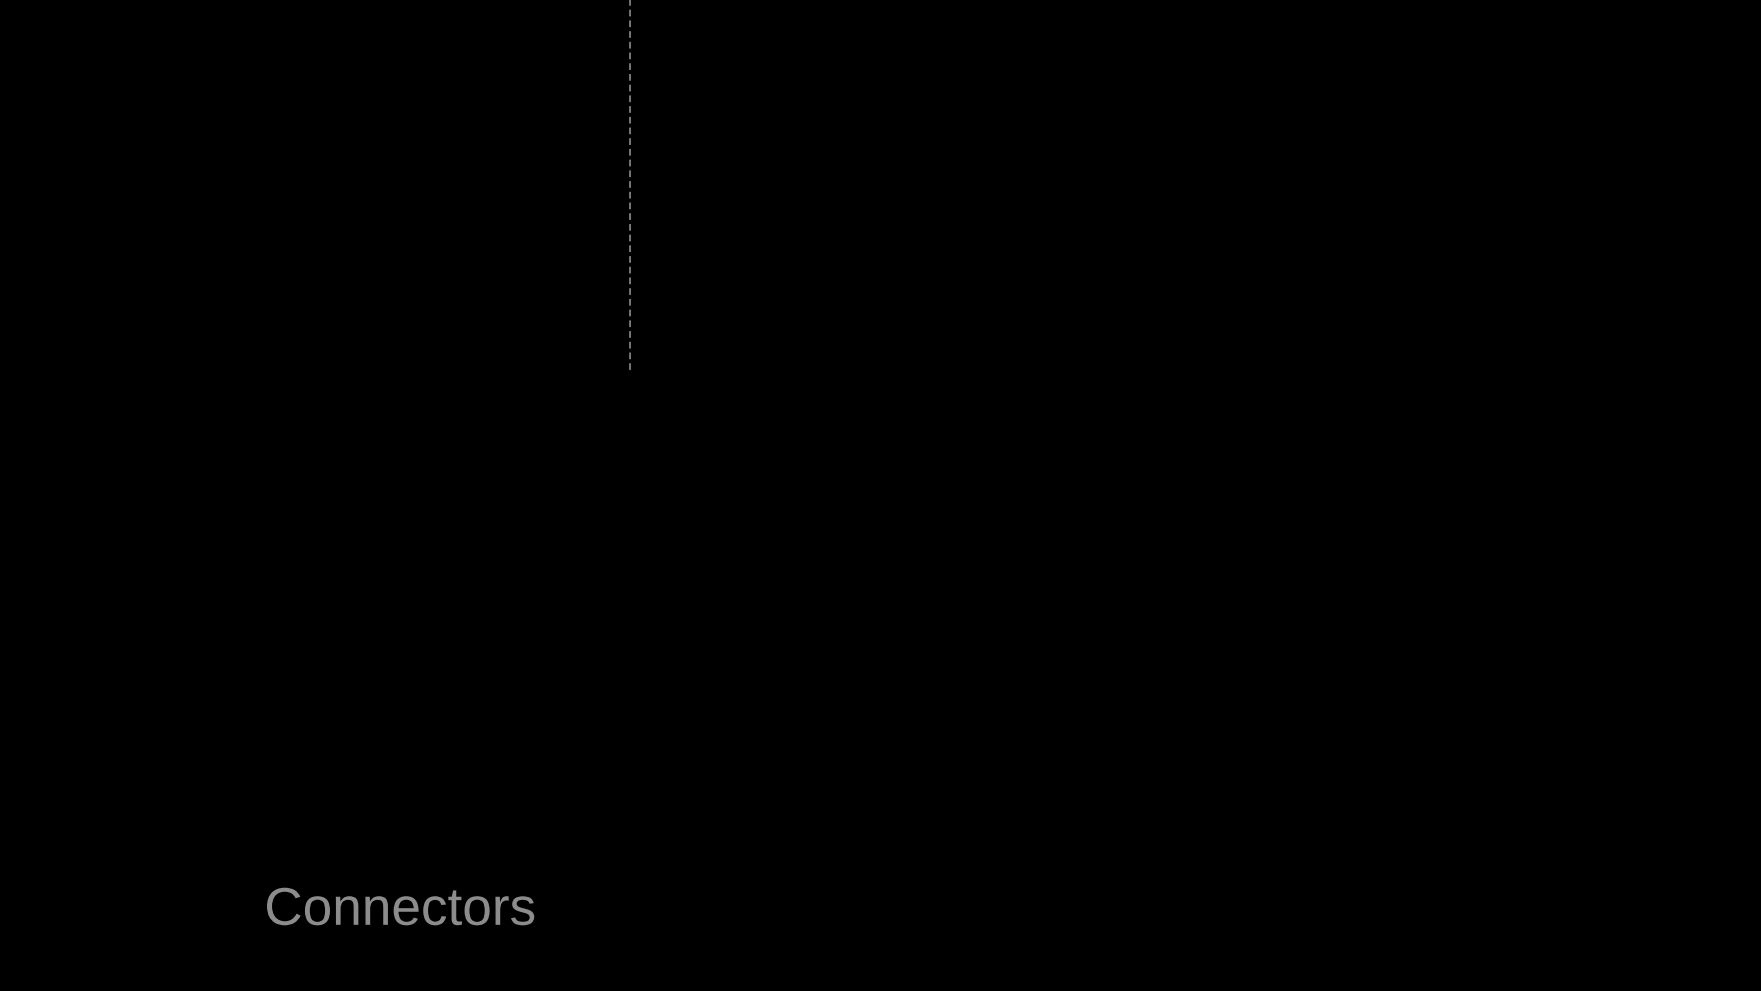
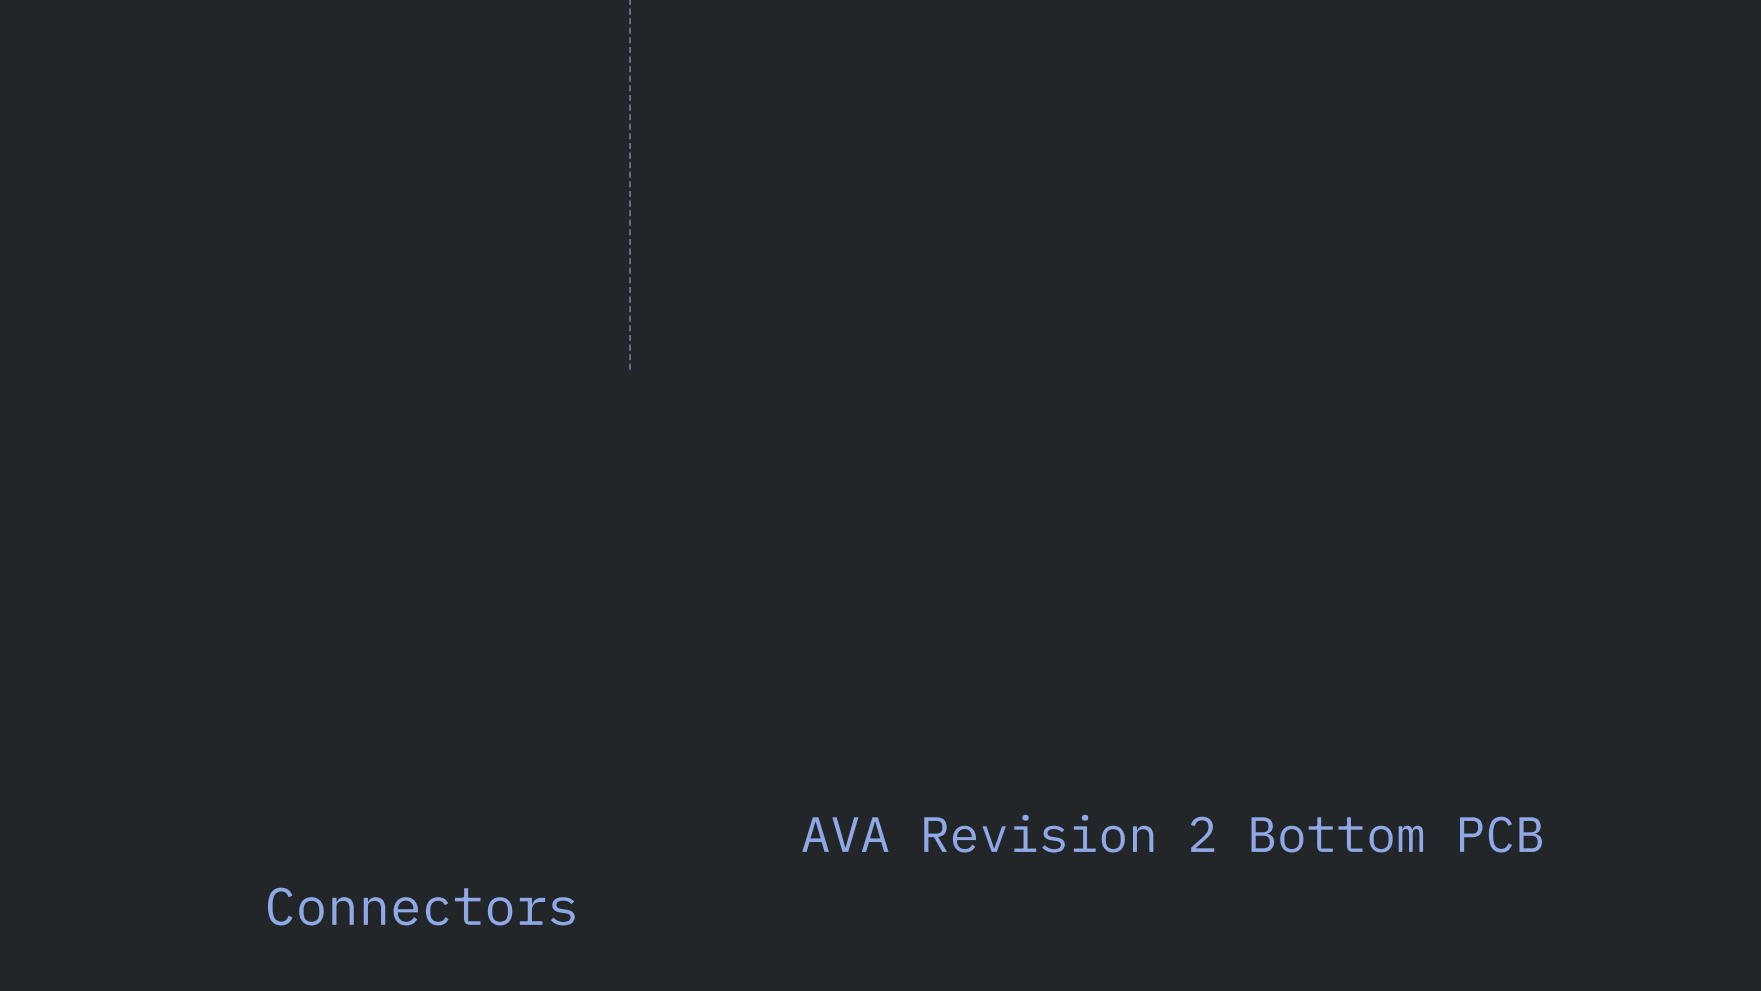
text: none -> AVA Revision 2 Bottom PCB (1172, 833)

